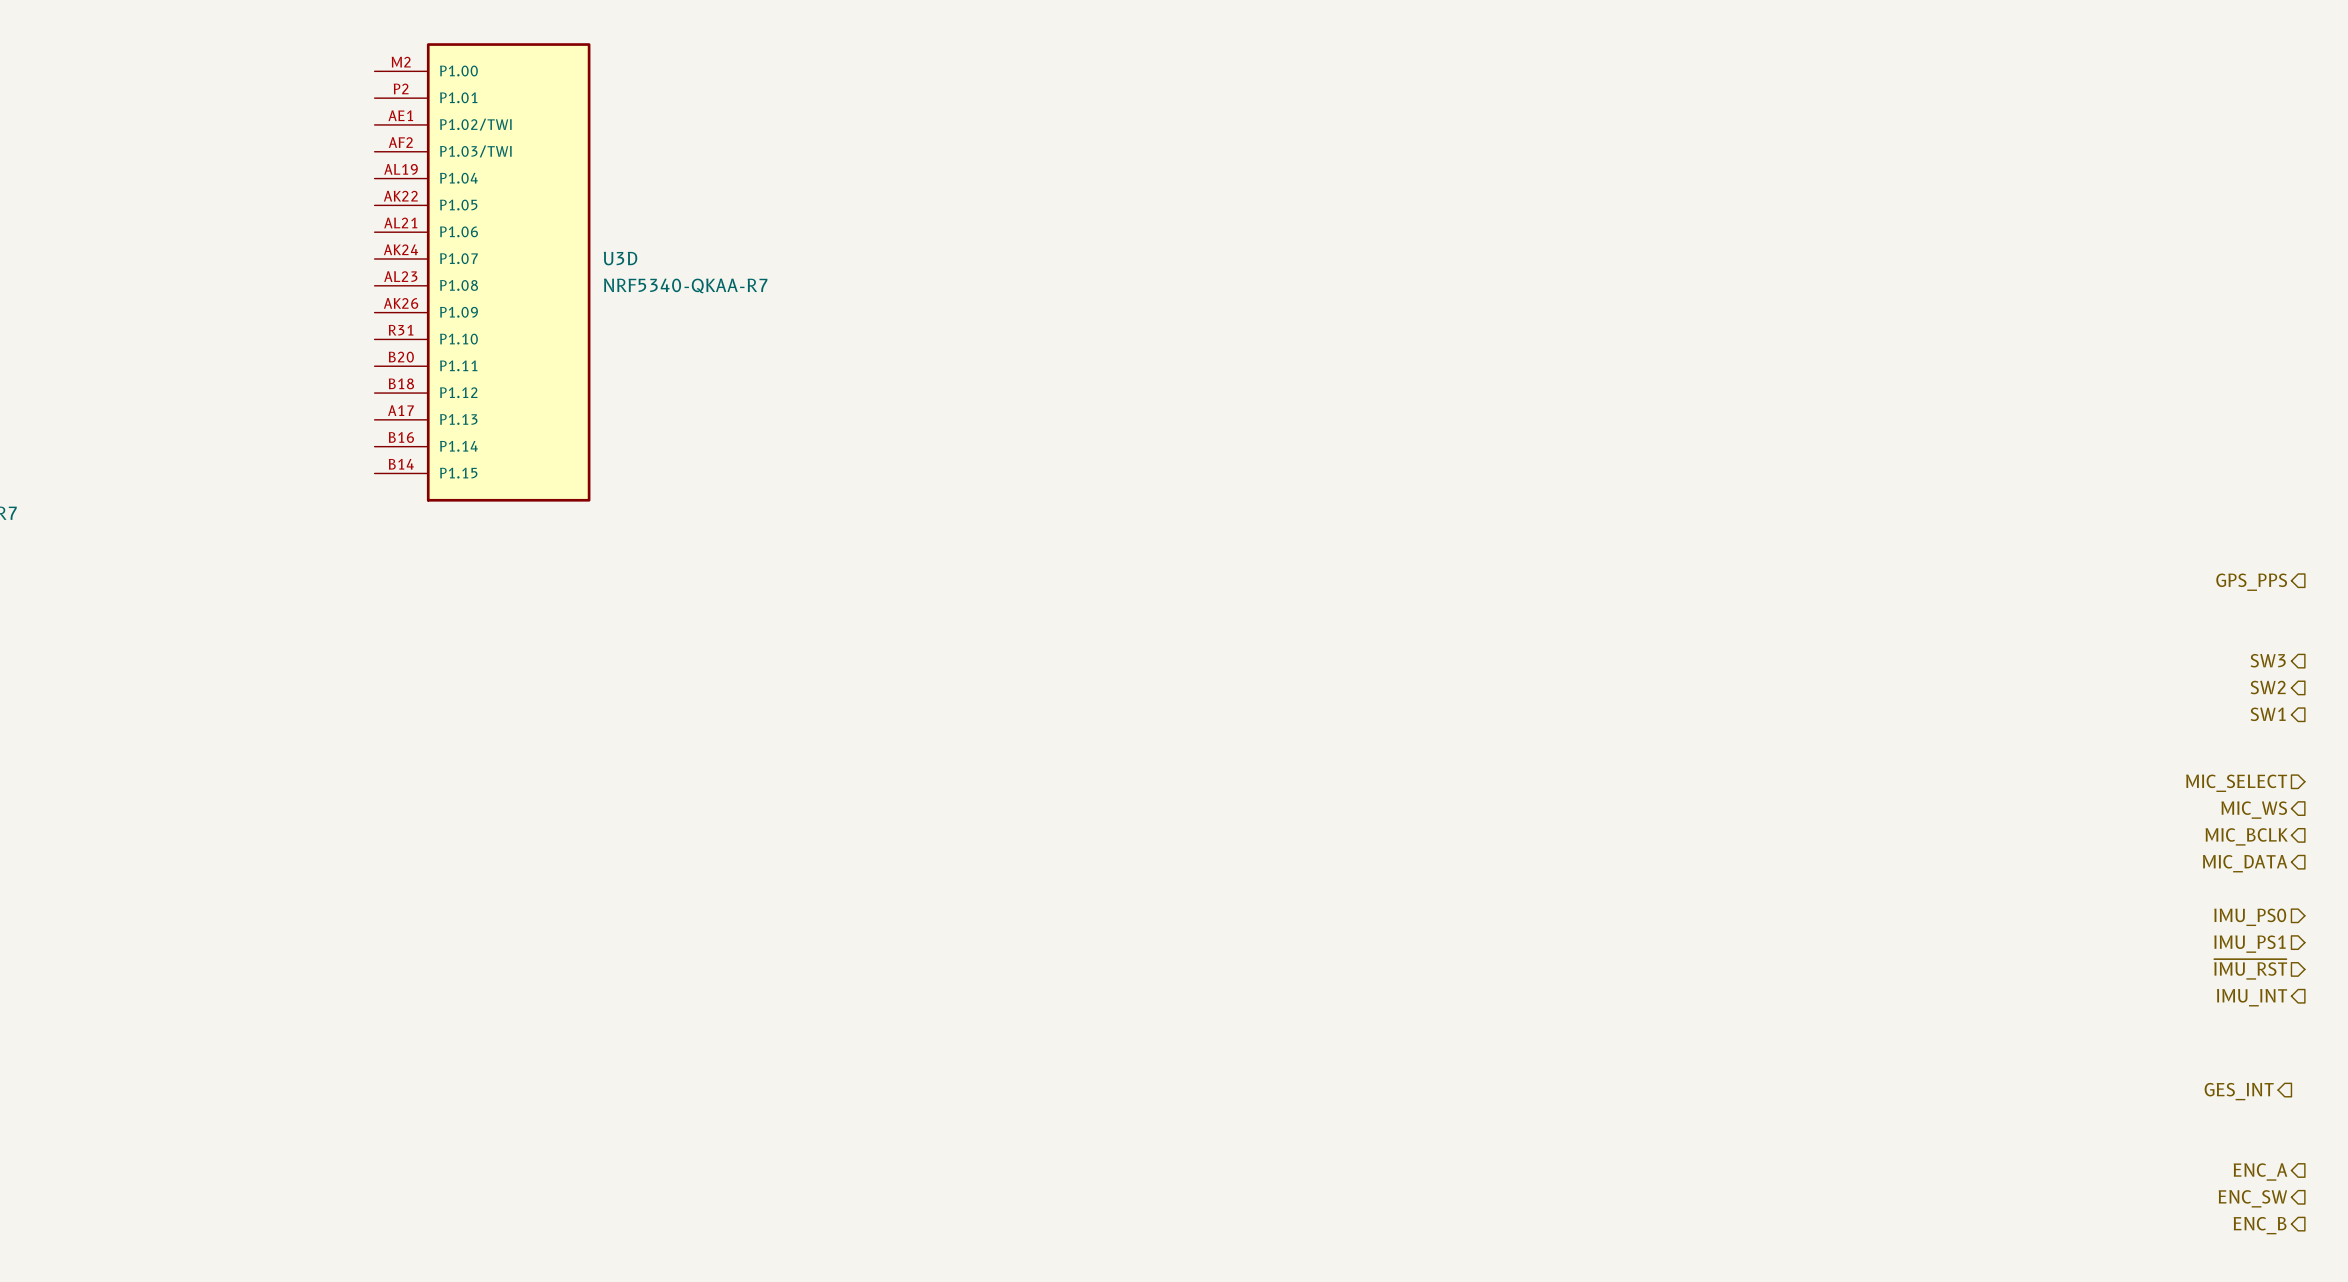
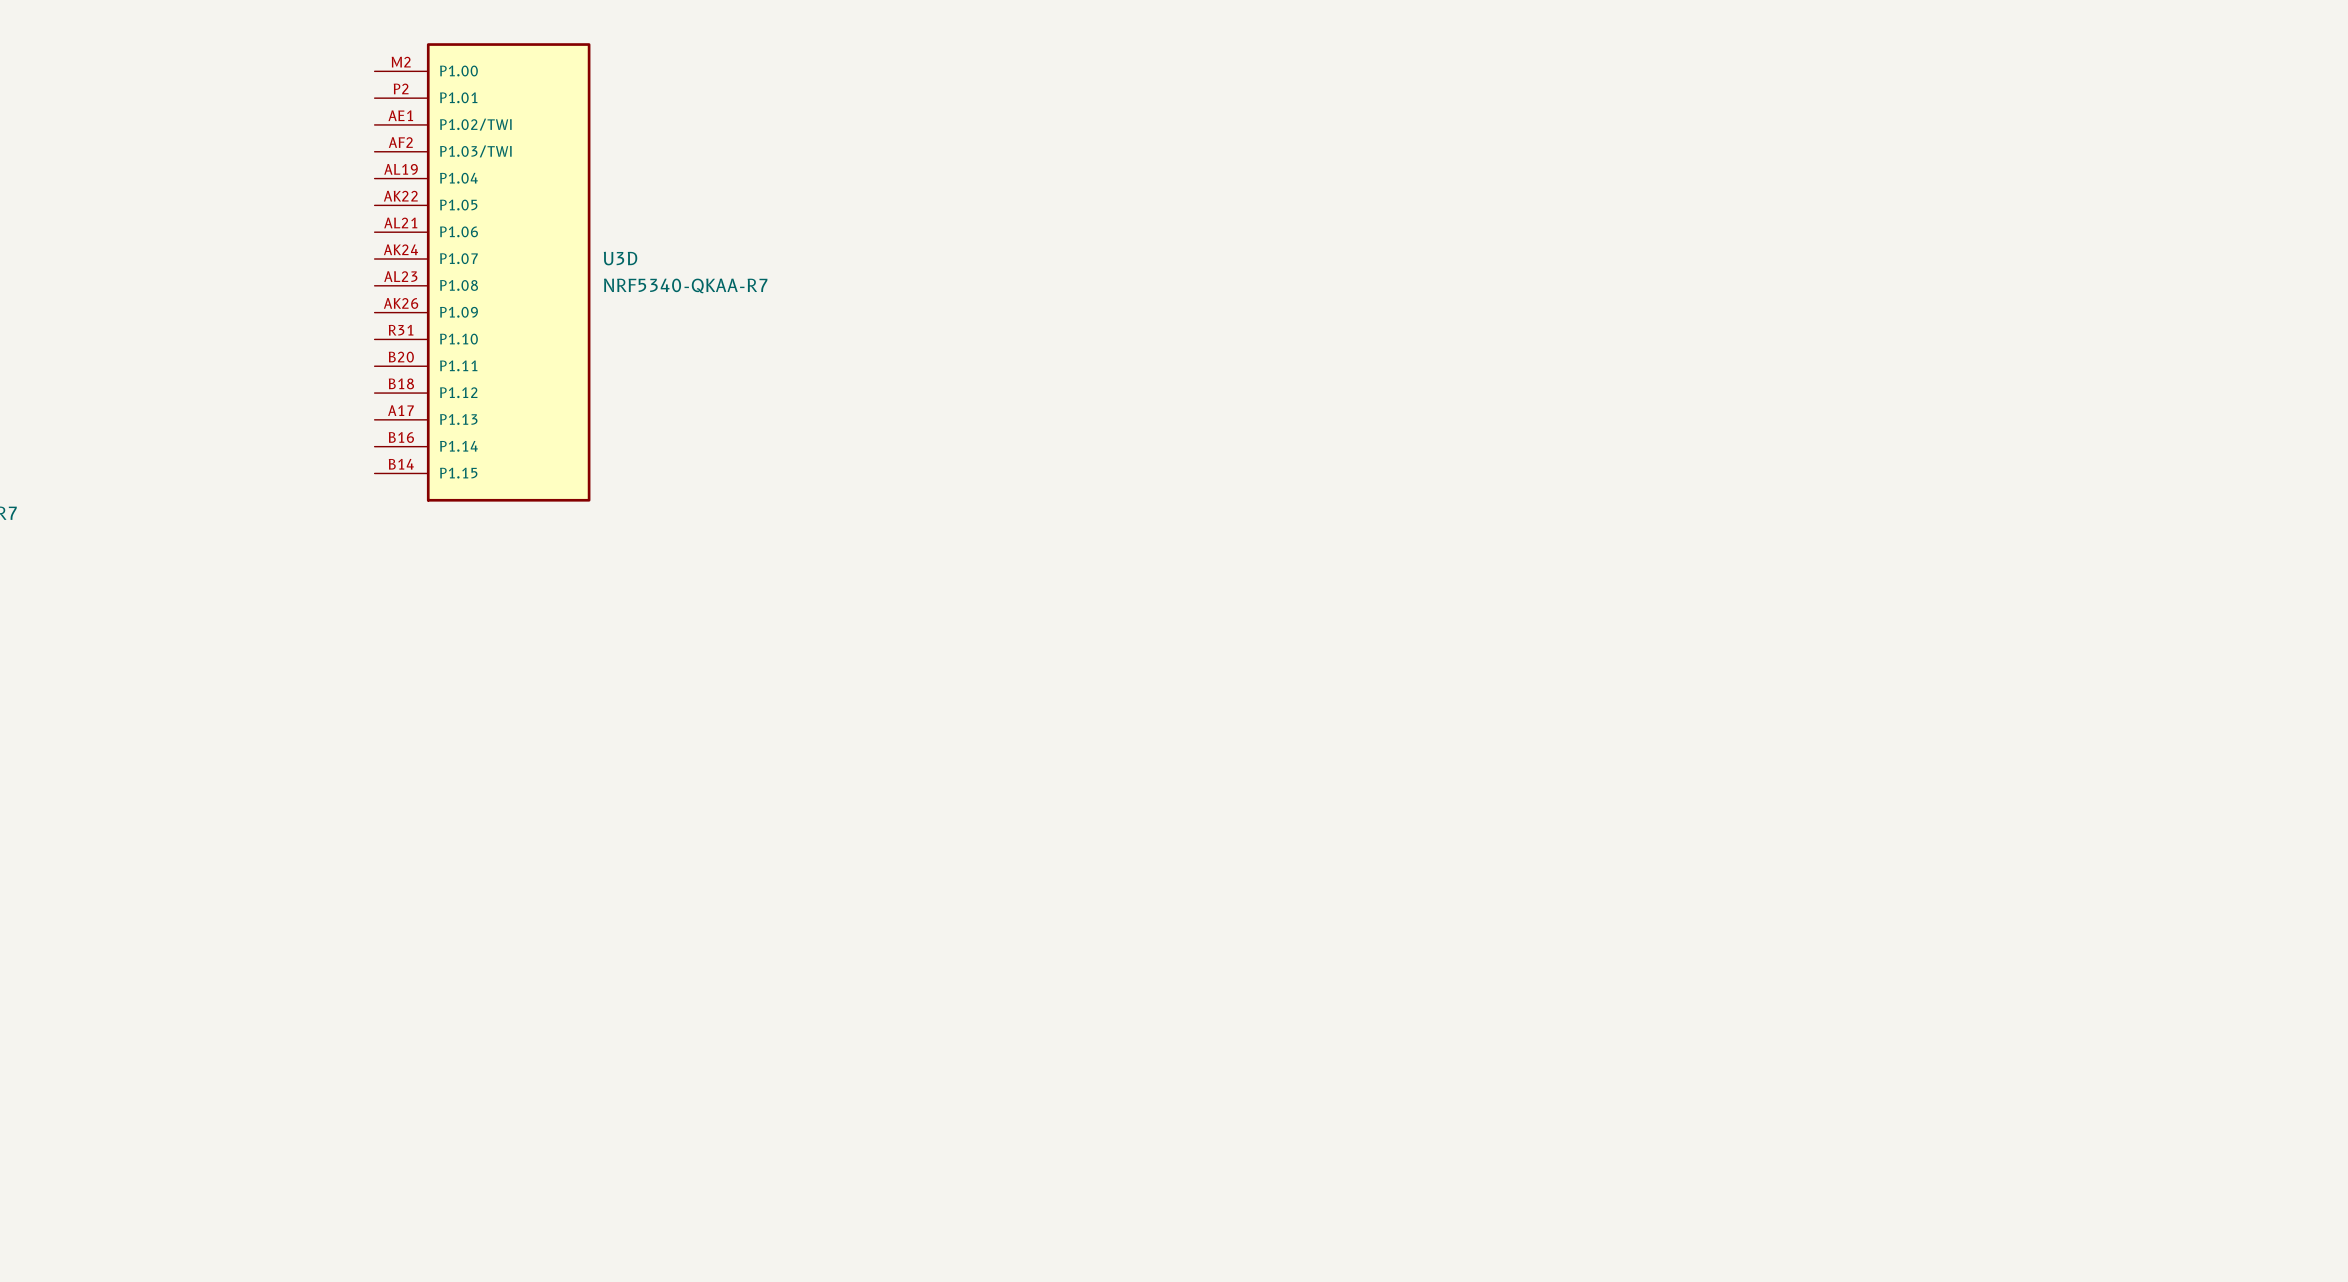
hierarchical label: GPS_PPS (2251, 582) -> none
hierarchical label: SW3 (2268, 660) -> none
hierarchical label: SW2 (2268, 687) -> none
hierarchical label: SW1 (2268, 714) -> none
hierarchical label: MIC_SELECT (2236, 783) -> none
hierarchical label: MIC_WS (2254, 810) -> none
hierarchical label: MIC_BCLK (2246, 836) -> none
hierarchical label: MIC_DATA (2245, 863) -> none
hierarchical label: IMU_PS0 (2250, 917) -> none
hierarchical label: IMU_PS1 (2249, 944) -> none
hierarchical label: ~{IMU_RST} (2250, 969) -> none
hierarchical label: IMU_INT (2252, 997) -> none
hierarchical label: GES_INT (2239, 1091) -> none
hierarchical label: ENC_A (2260, 1172) -> none
hierarchical label: ENC_SW (2252, 1198) -> none
hierarchical label: ENC_B (2260, 1225) -> none

